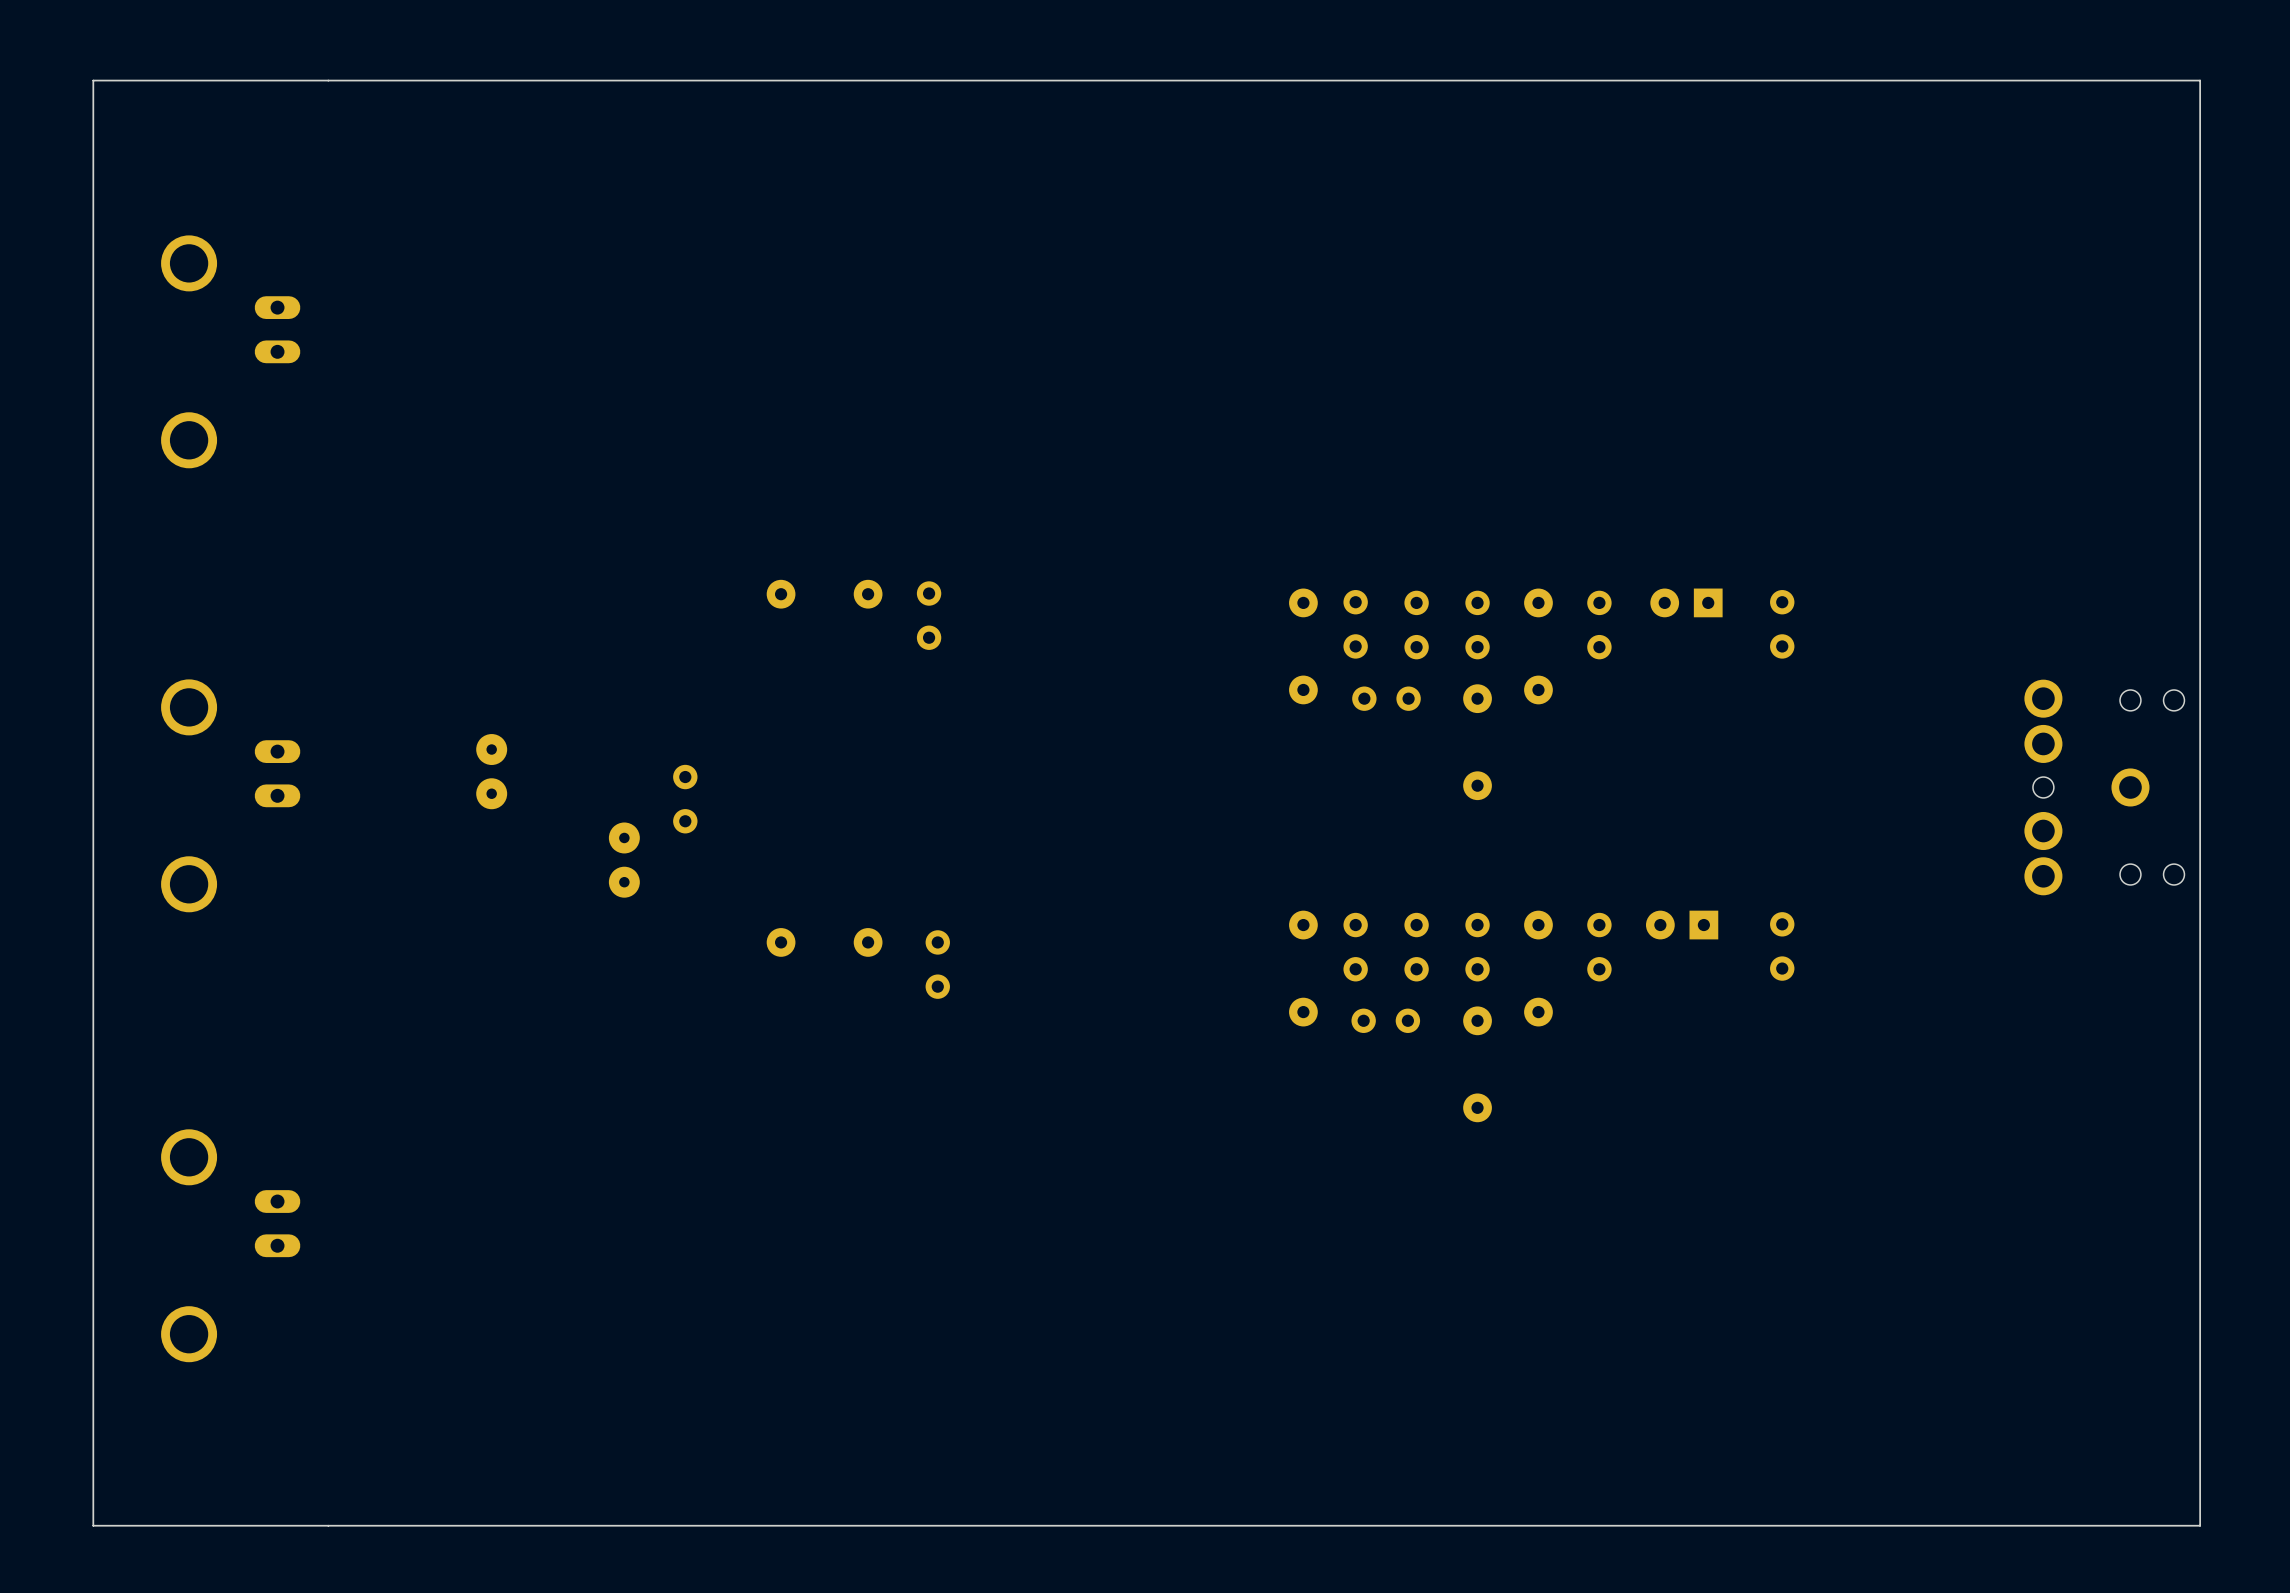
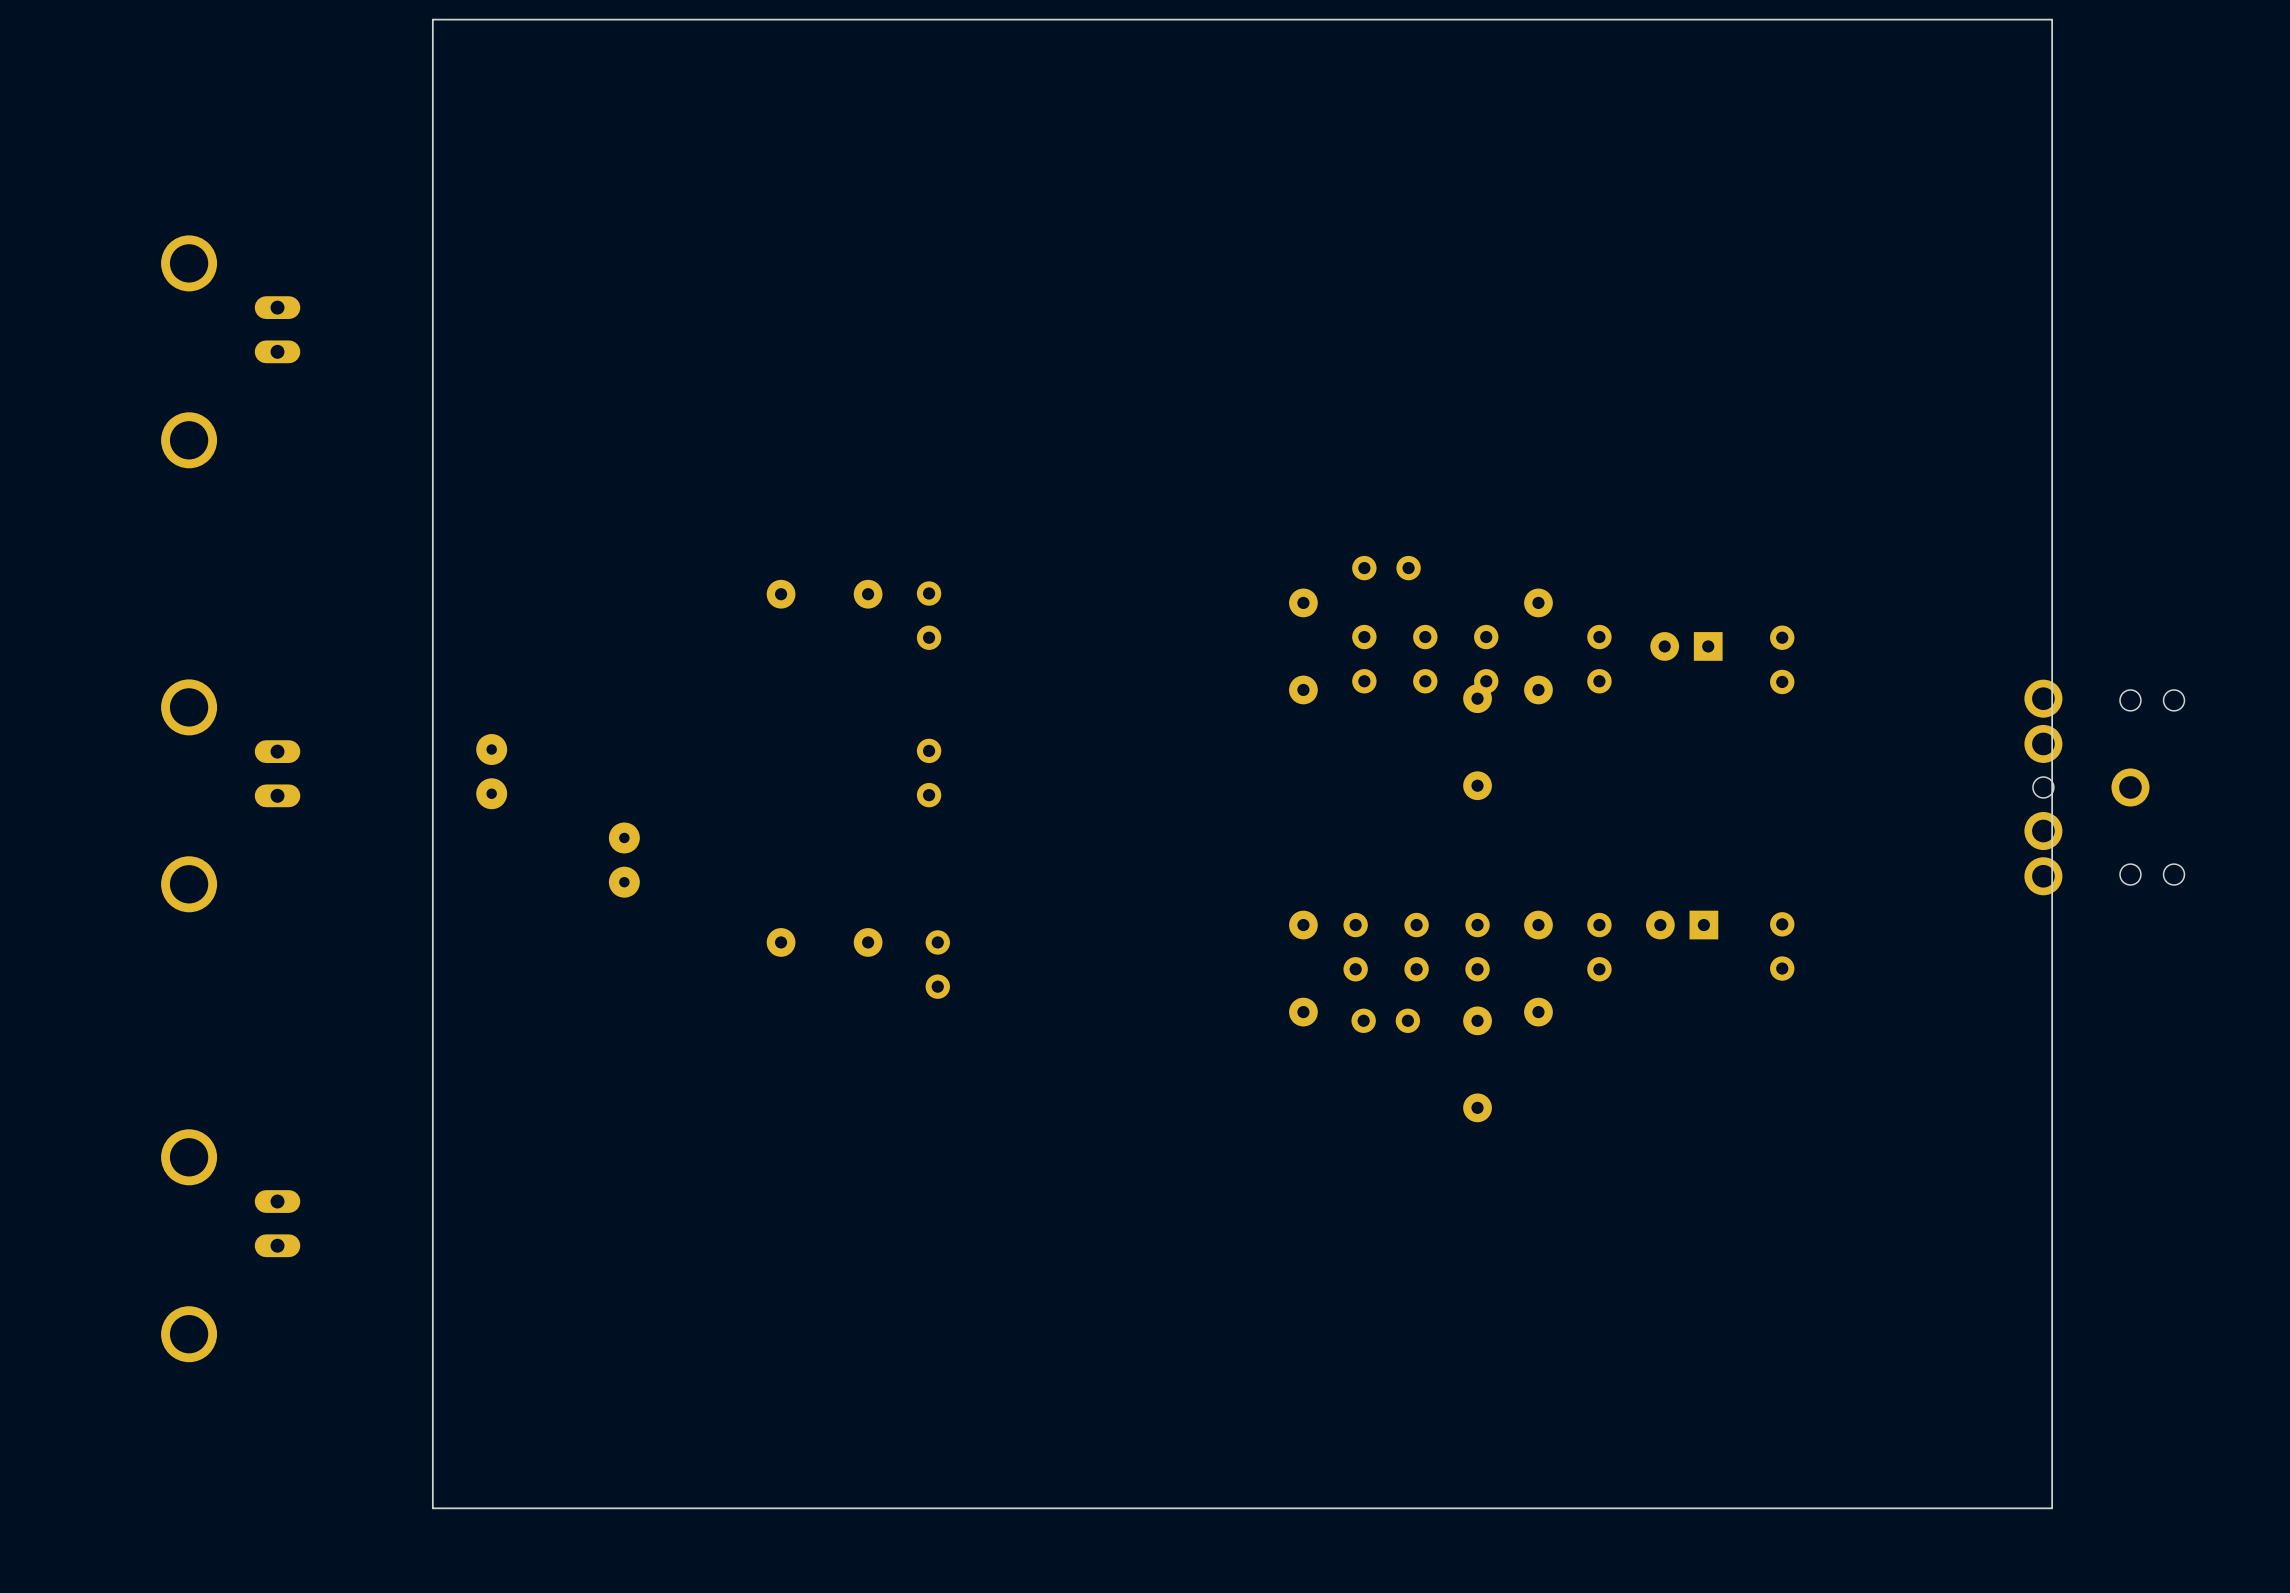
board edge: (2200, 80) (93, 80) (93, 1525) (2200, 1525) (2200, 80) -> (2052, 19) (2052, 1508) (432, 1508) (432, 19) (2052, 19)
part: none -> (1386, 568)
part position: (1686, 602) -> (1686, 646)
part: (1355, 624) -> none
part position: (1782, 624) -> (1782, 659)
part: (1416, 625) -> none
part: (1477, 625) -> none
part position: (1599, 625) -> (1599, 659)
part: none -> (1364, 659)
part: none -> (1425, 659)
part: none -> (1486, 659)
part: (1386, 698) -> none
part: none -> (929, 773)
part: (685, 799) -> none

